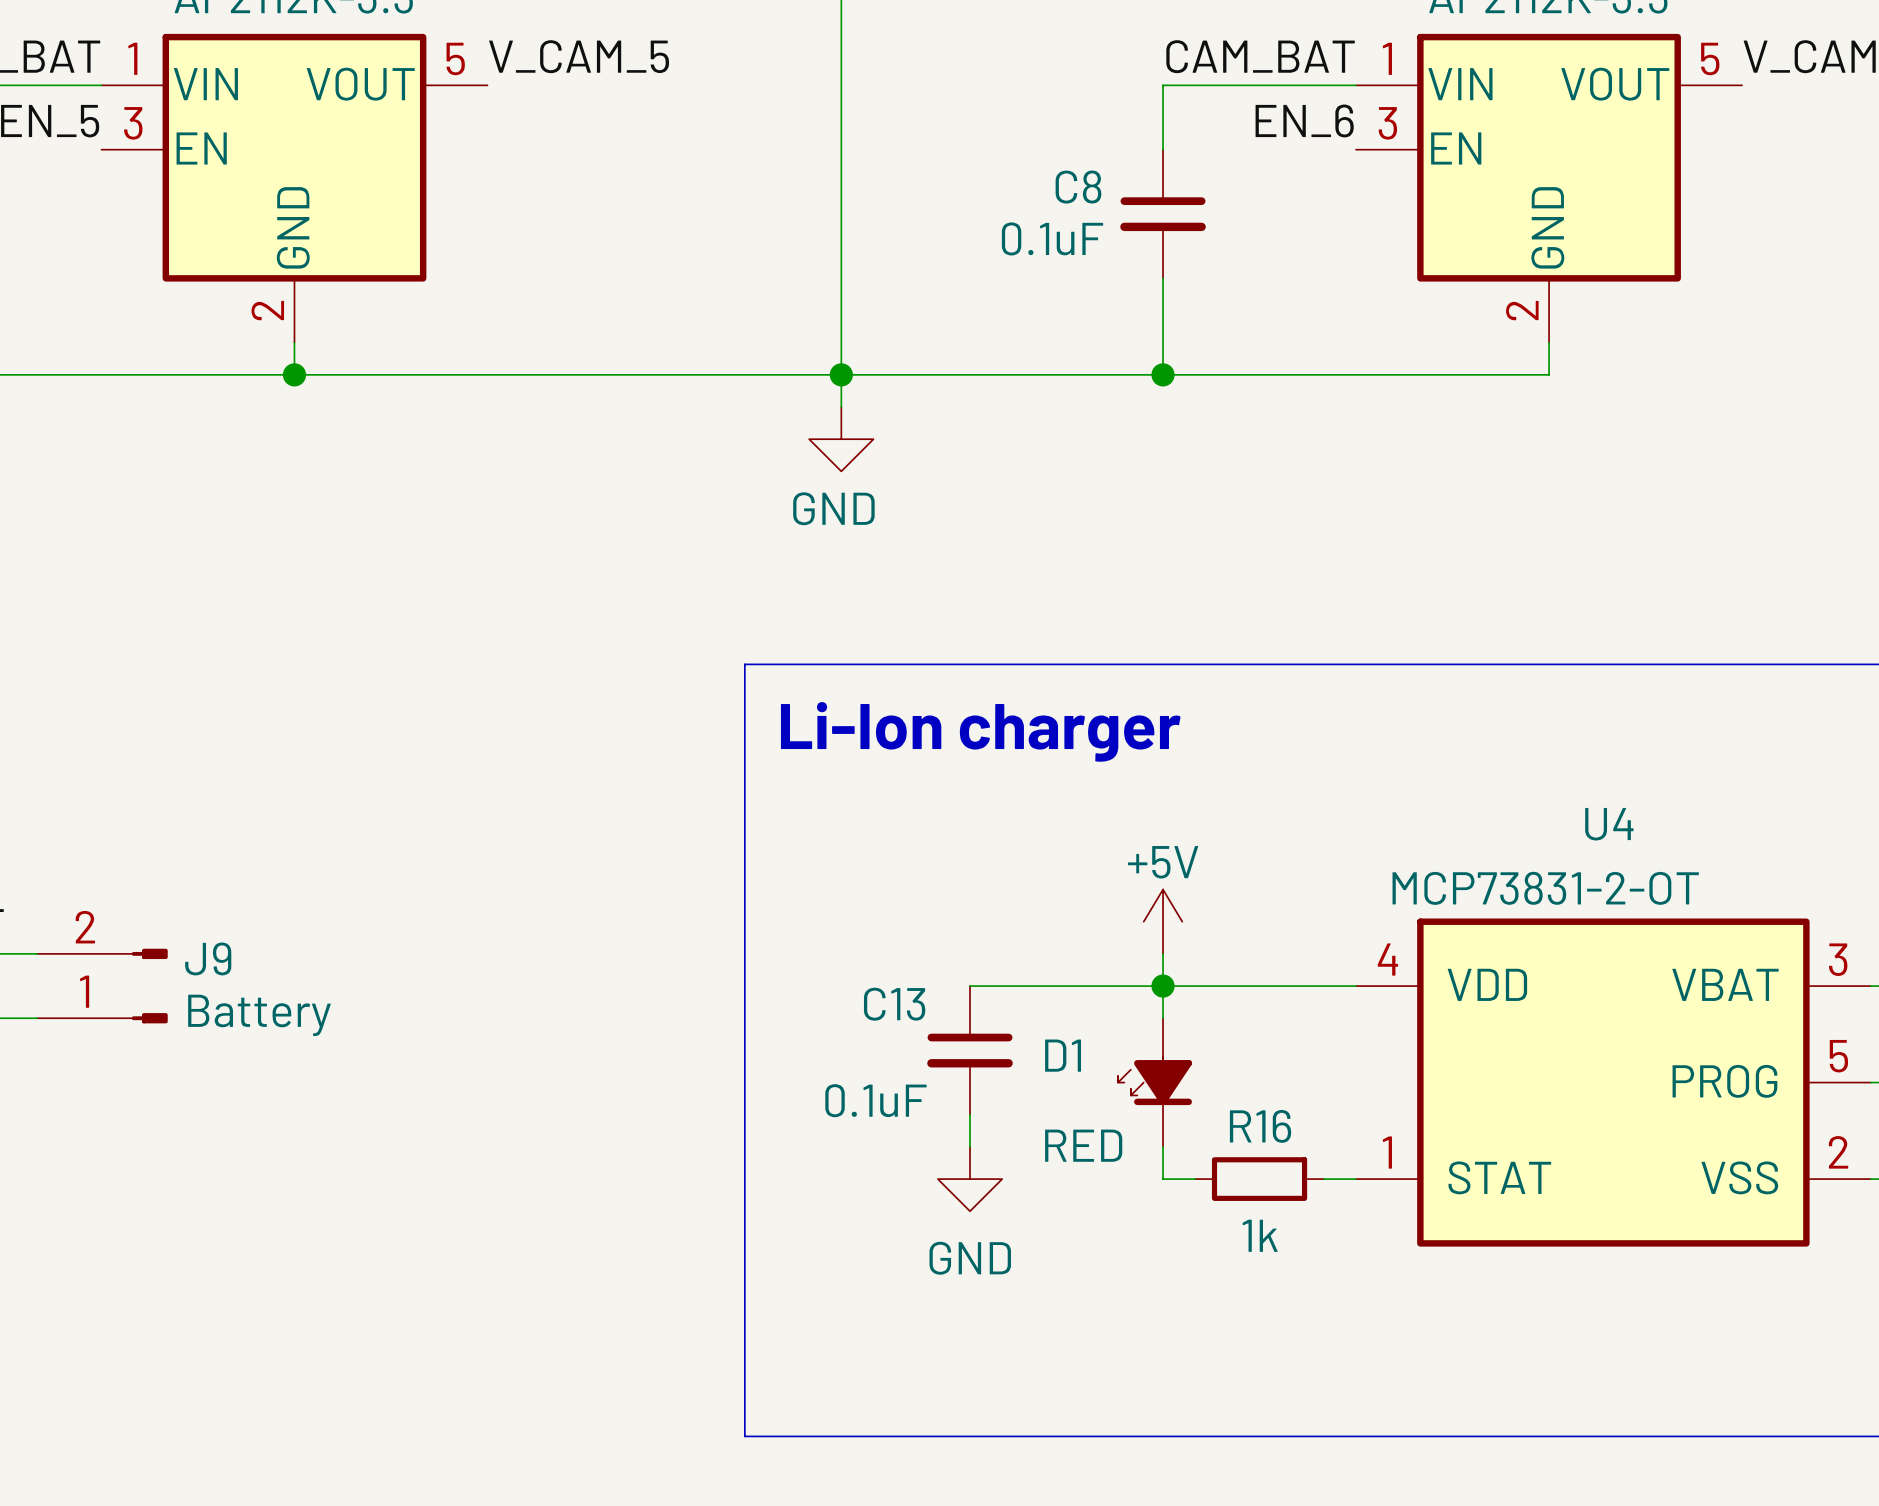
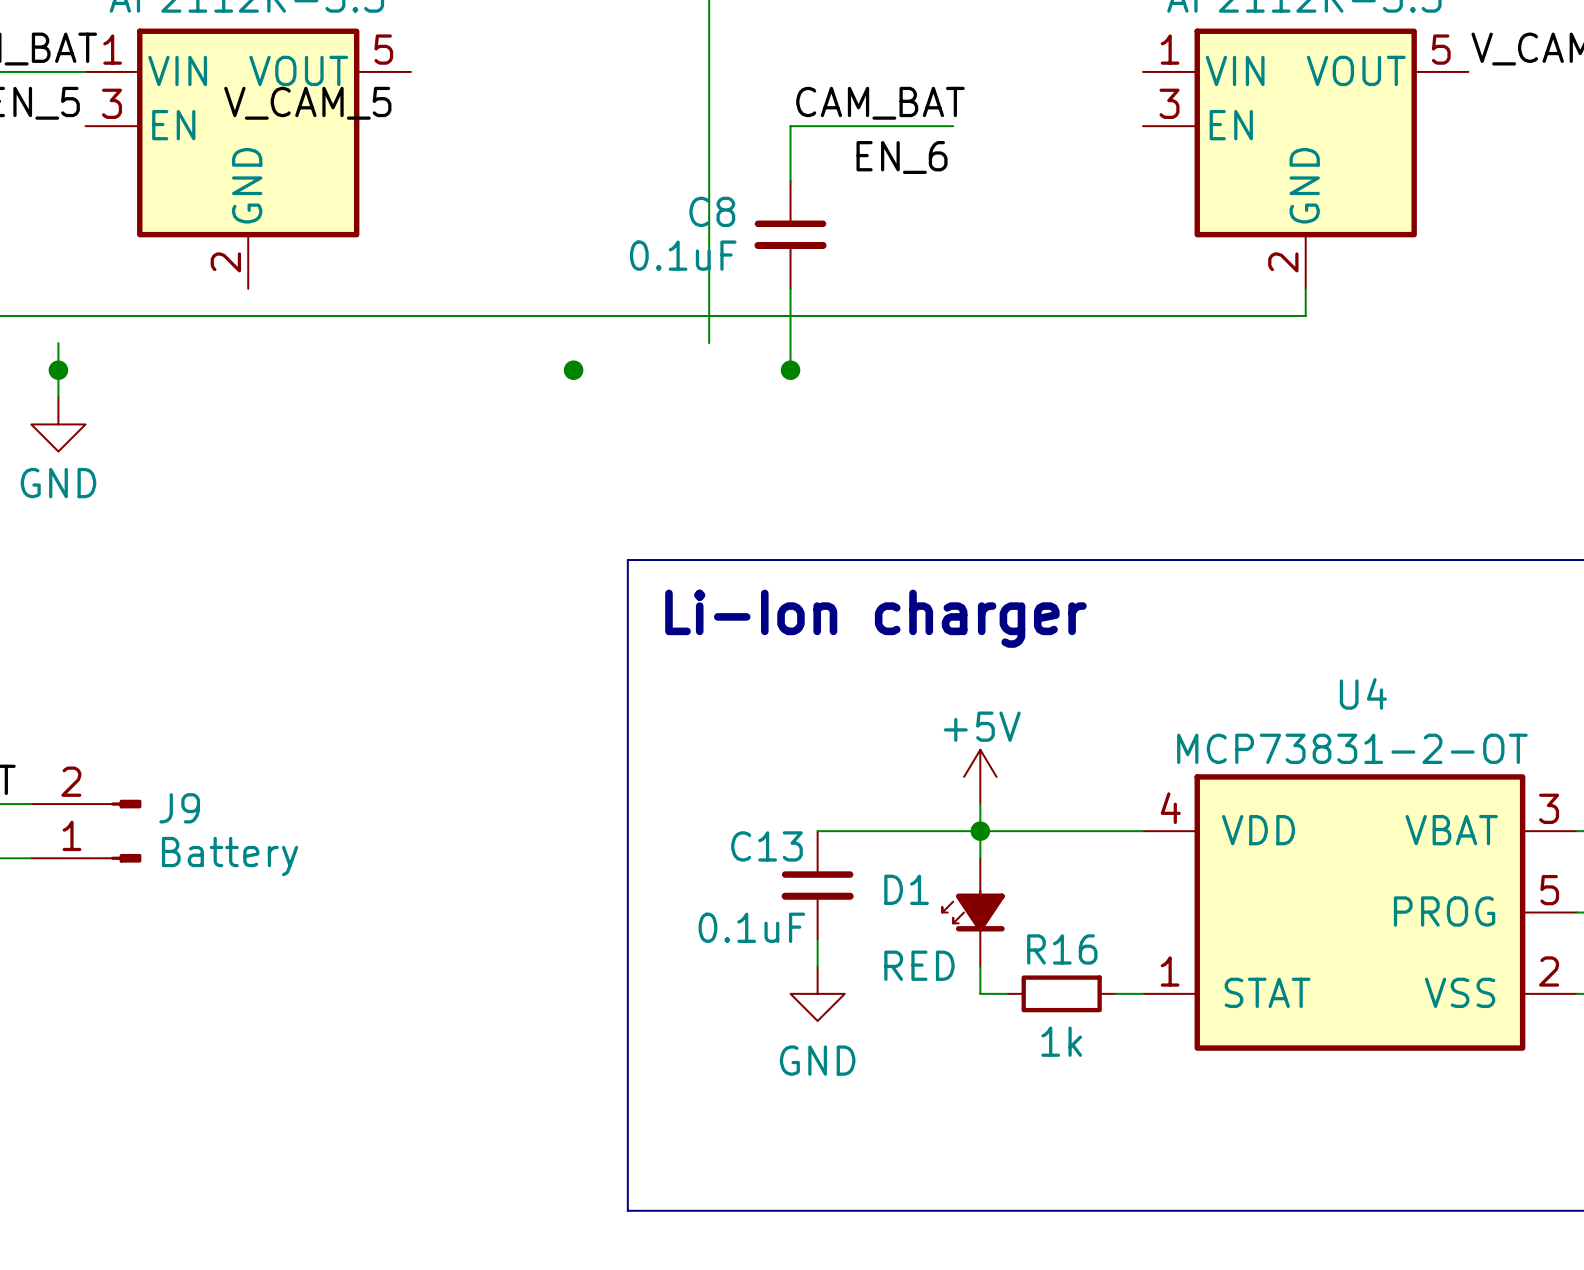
label position: V_CAM_5 (579, 56) -> V_CAM_5 (307, 103)
label position: CAM_BAT (1260, 56) -> CAM_BAT (880, 103)
wire: (1356, 85) (1163, 85) (1163, 149) -> (953, 126) (790, 126) (790, 180)
label position: EN_6 (1304, 120) -> EN_6 (902, 157)
C8 position: (1163, 214) -> (790, 234)
wire: (1163, 278) (1163, 374) -> (790, 288) (790, 370)
wire: (294, 342) (294, 374) -> none
junction: (294, 374) -> none
junction: (841, 374) -> none
junction: (1163, 374) -> none
wire: none -> (58, 343) (58, 397)
junction: none -> (58, 370)
junction: none -> (573, 370)
power symbol: GND (841, 439) -> none
junction: none -> (790, 370)
power symbol: none -> GND (58, 424)

